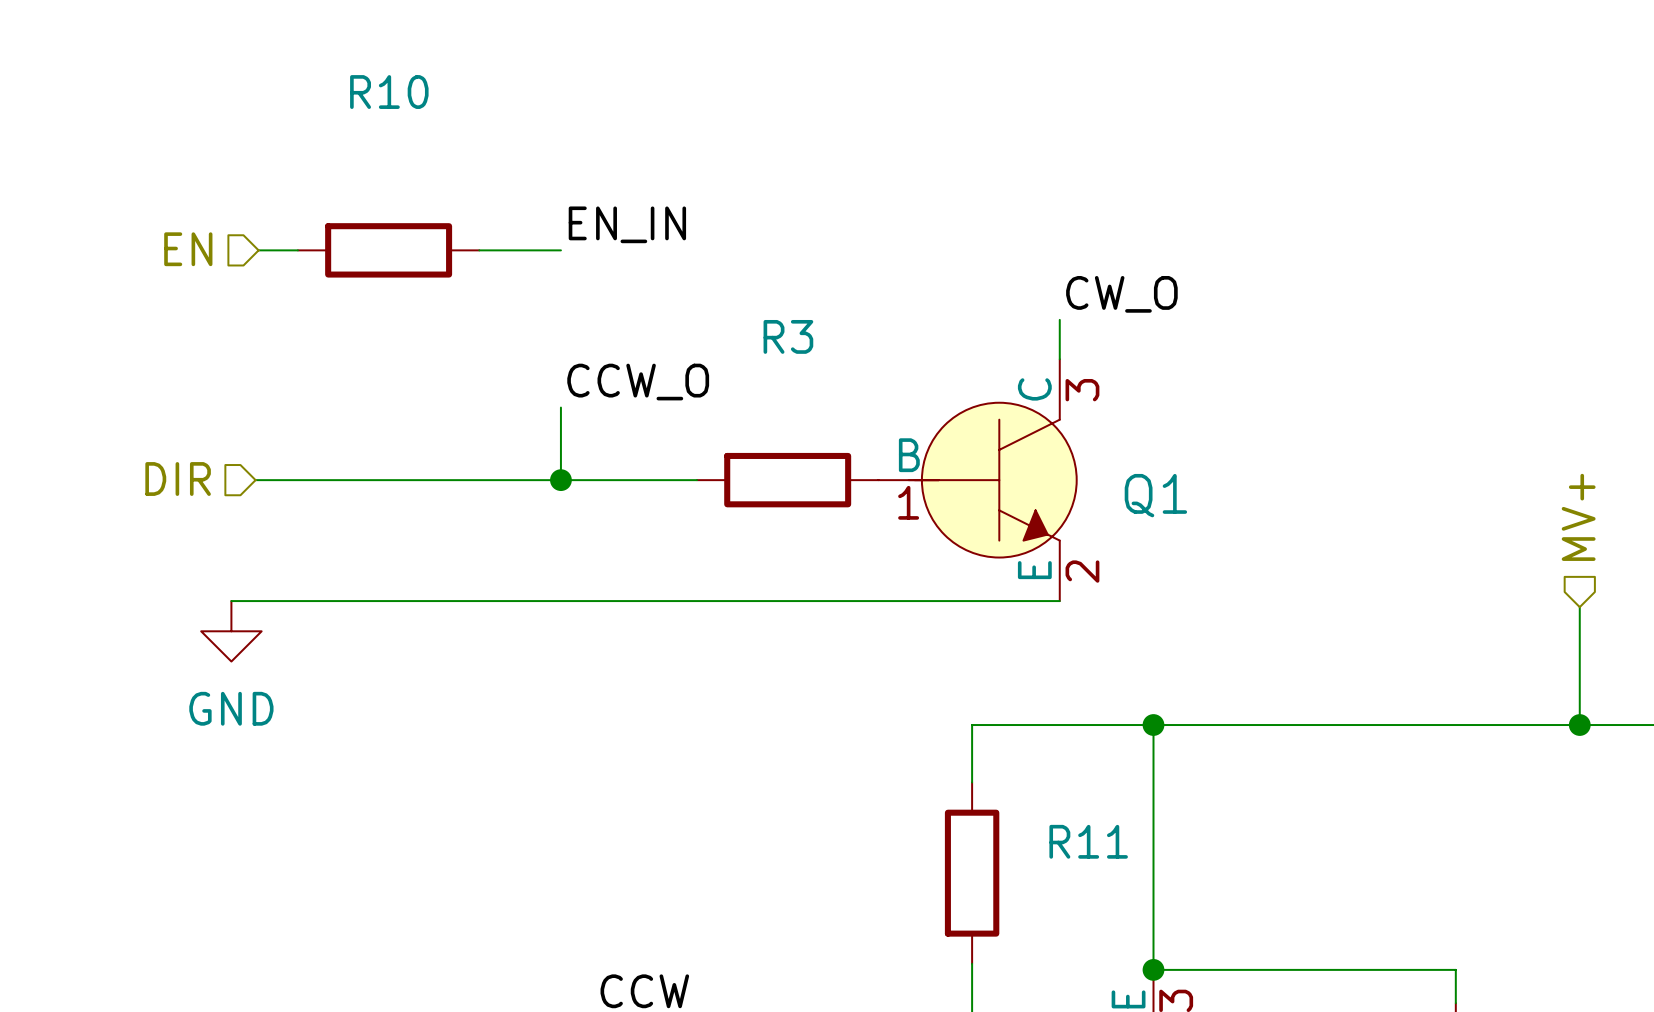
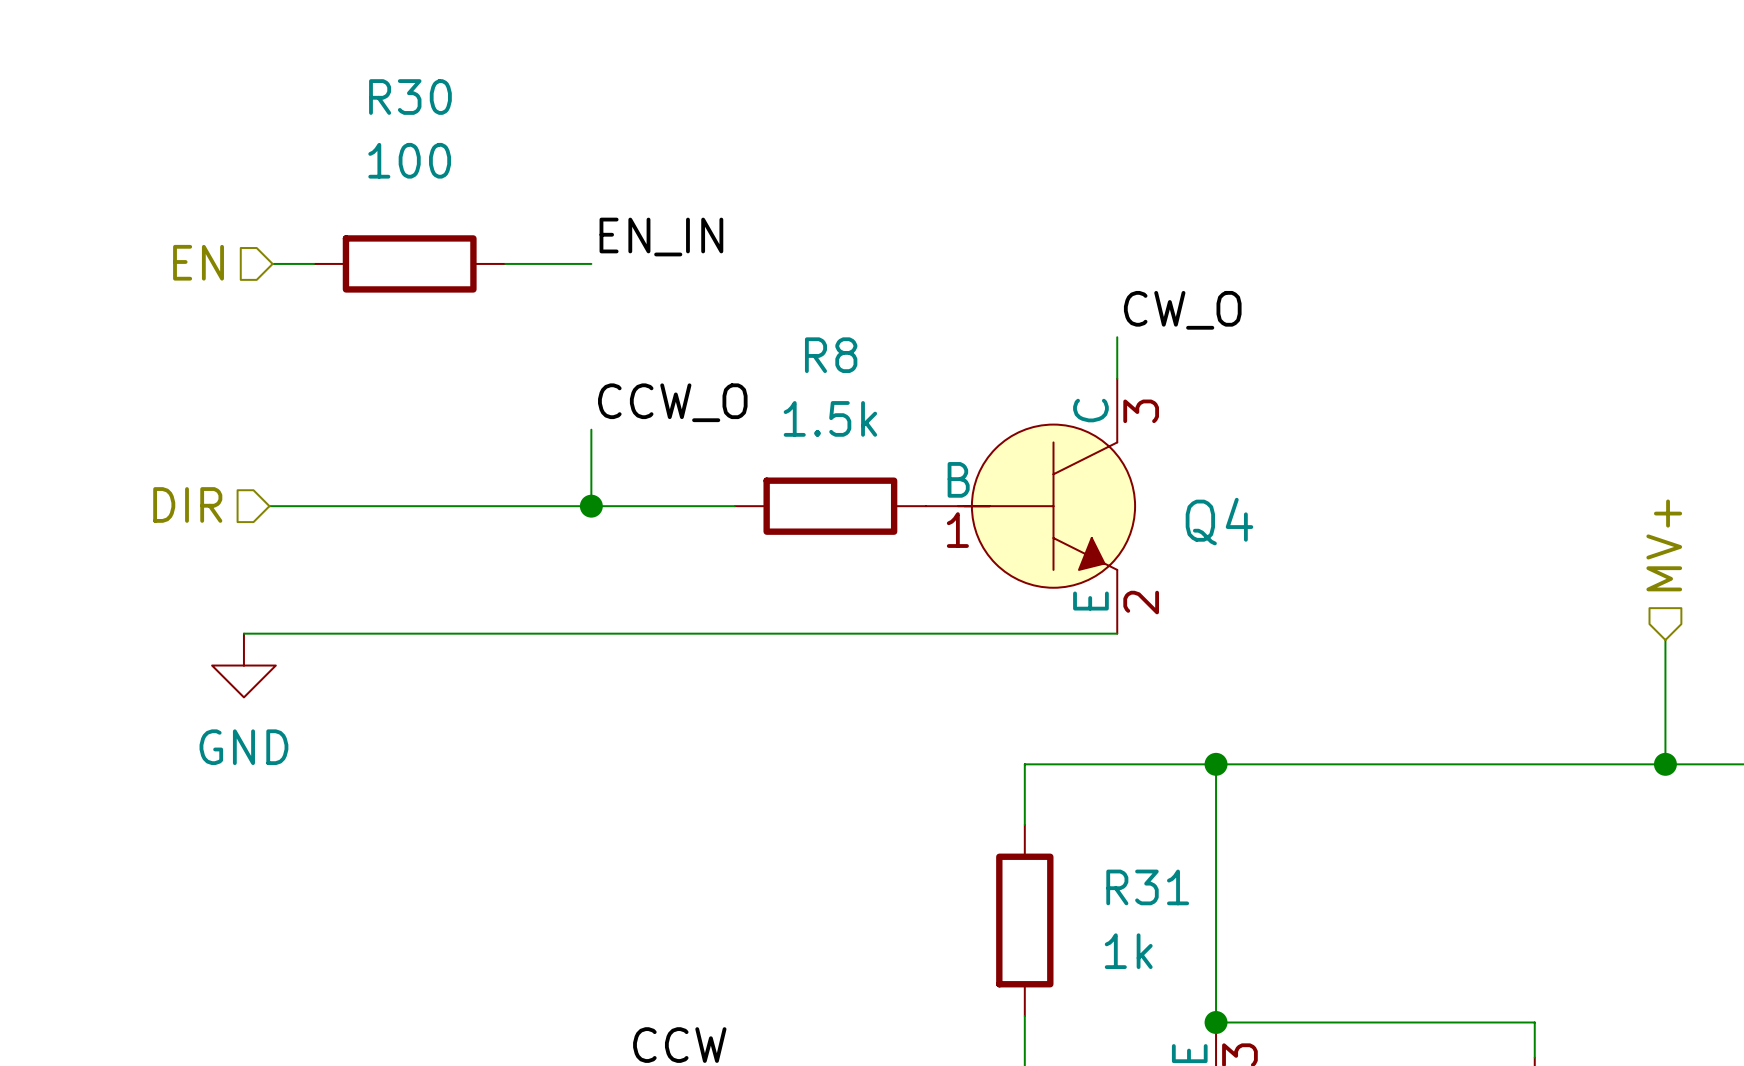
R10 name: R10 (389, 92) -> R30 (410, 97)
R10 value: none -> 100 (409, 160)
R3 name: R3 (788, 336) -> R8 (831, 355)
R3 value: none -> 1.5k (830, 418)
Q1 name: Q1 (1155, 495) -> Q4 (1219, 521)
R11 name: R11 (1088, 841) -> R31 (1147, 887)
R11 value: none -> 1k (1128, 951)

